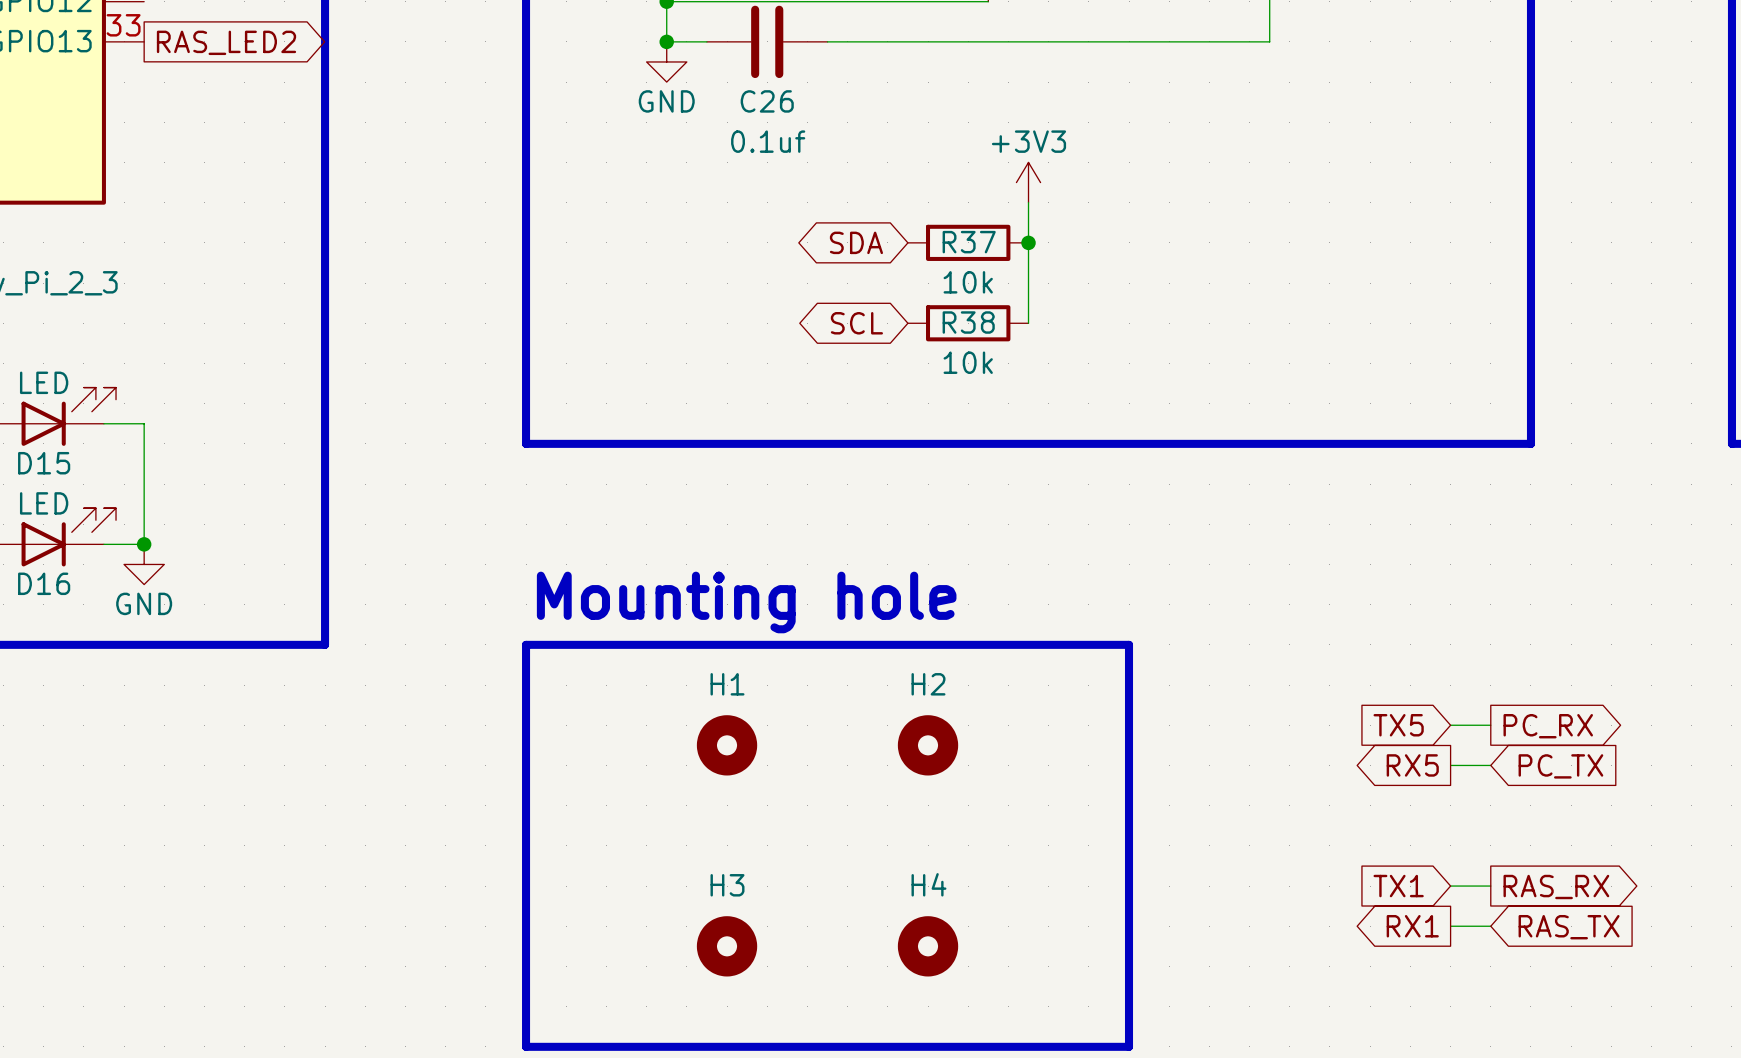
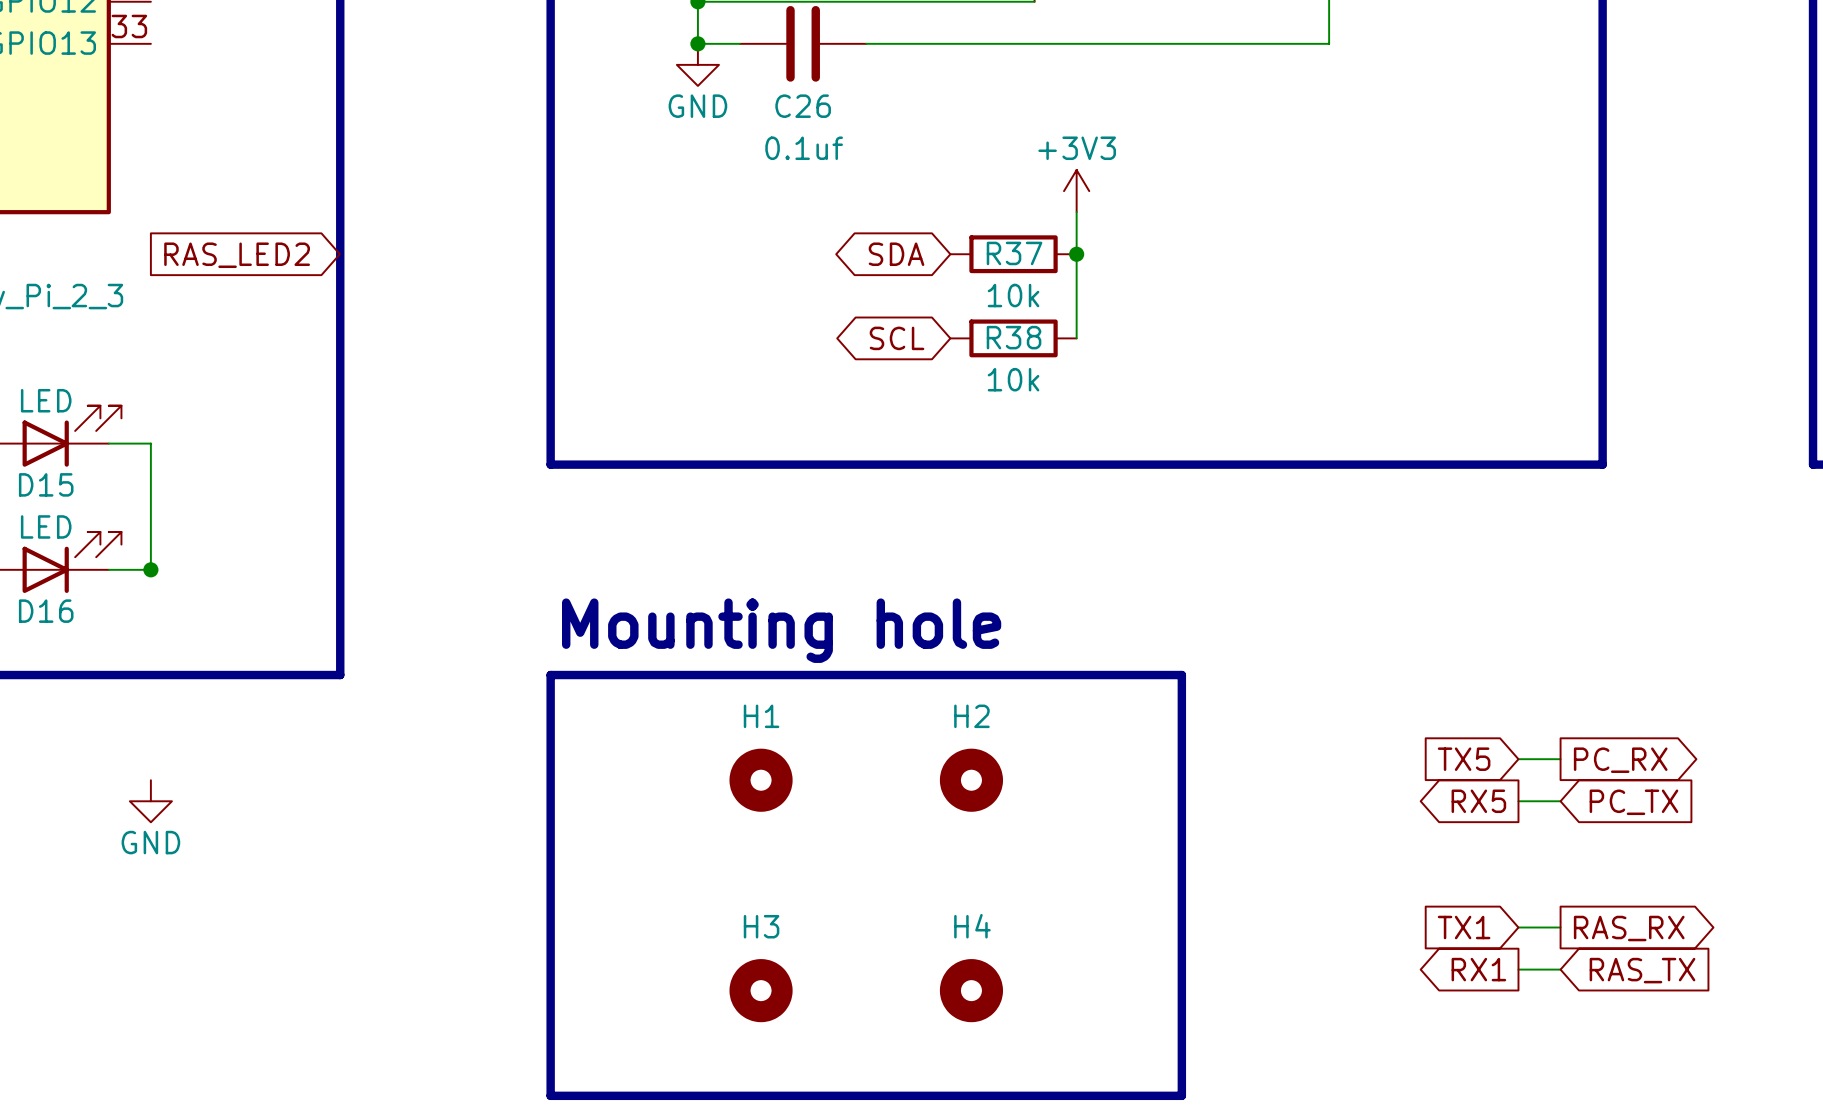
global label position: RAS_LED2 (226, 42) -> RAS_LED2 (237, 255)
power symbol: GND (144, 564) -> none
power symbol: none -> GND (150, 801)

